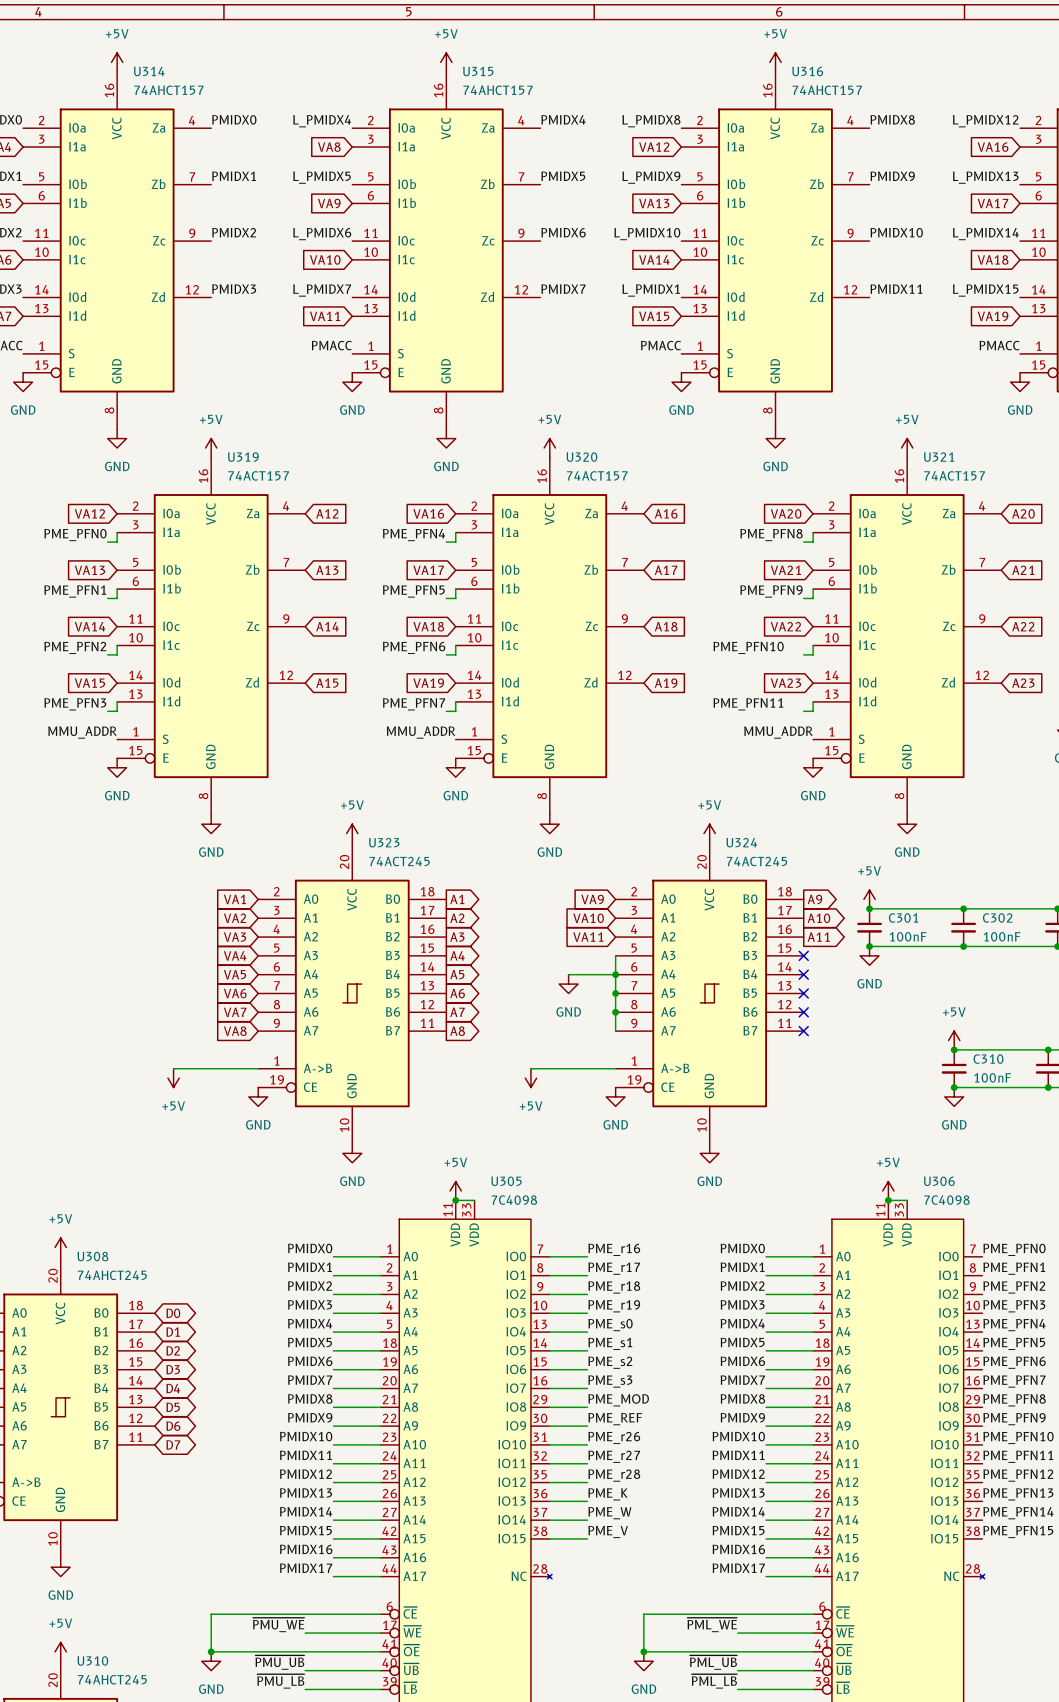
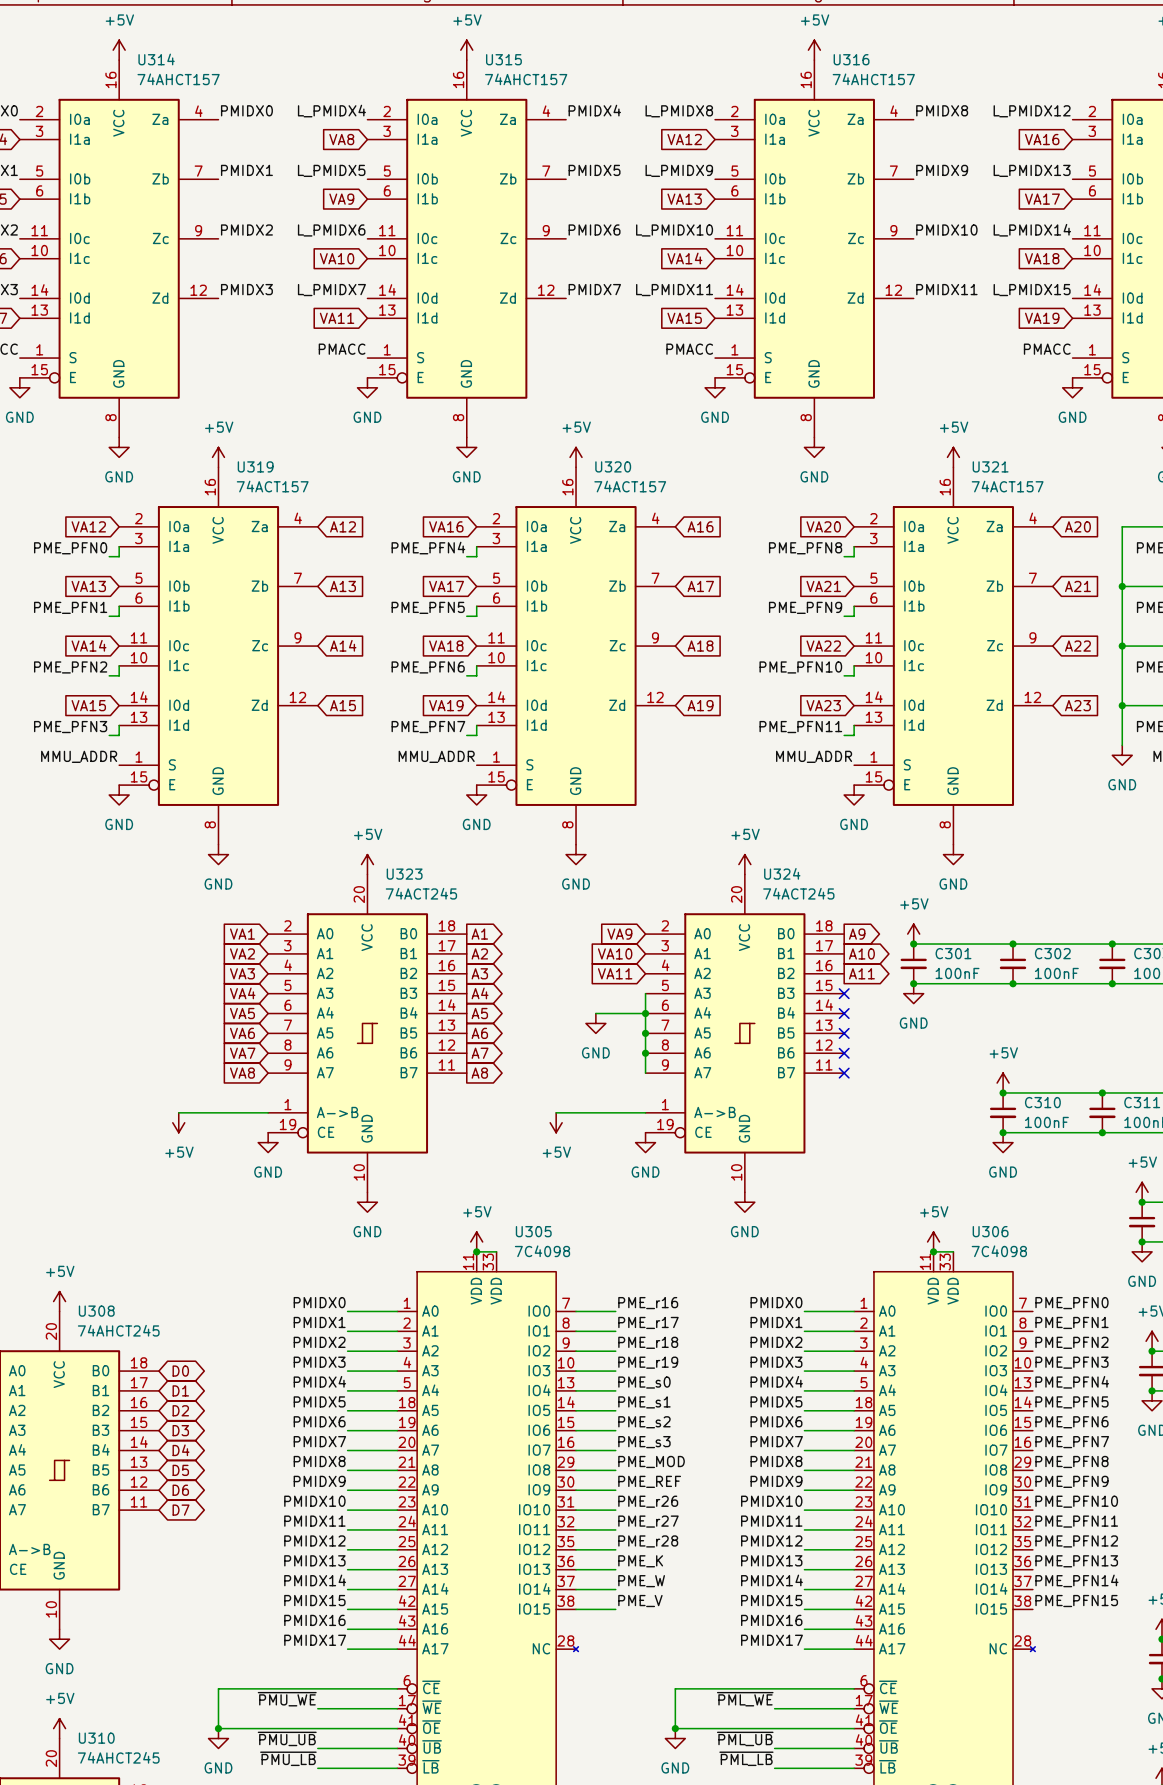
label: L_PMIDX1 (651, 290) -> L_PMIDX11 (674, 290)
label position: PME_PFN10 (748, 647) -> PME_PFN10 (800, 667)
label position: PME_PFN11 (748, 704) -> PME_PFN11 (800, 727)

